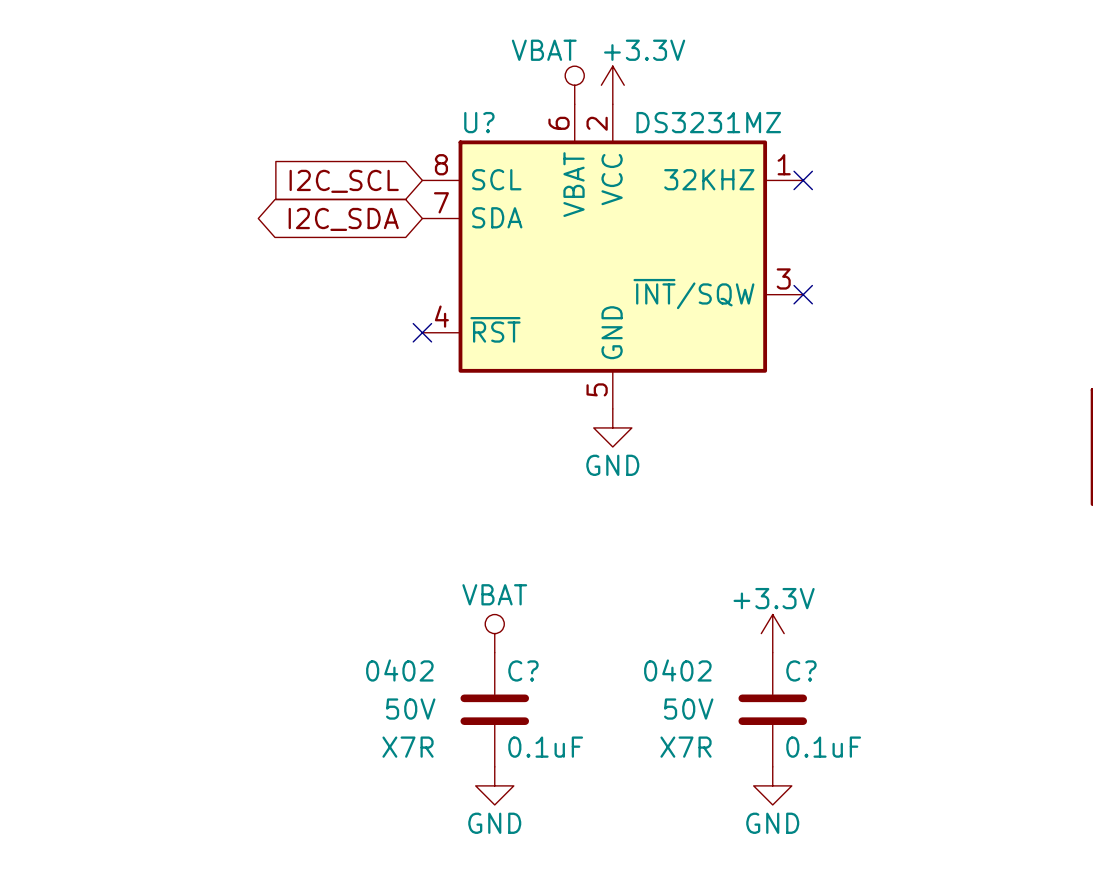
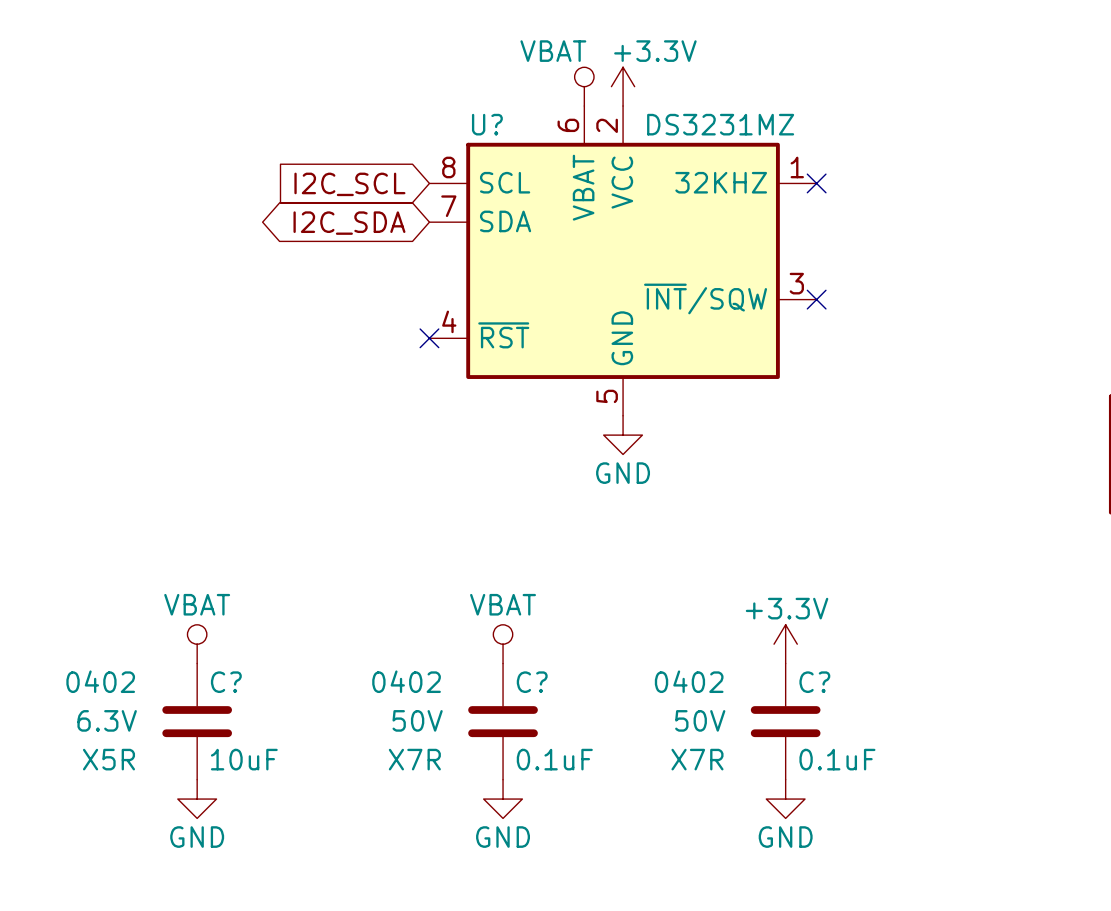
power symbol: none -> VBAT (197, 644)
C?: none -> 10uF (197, 721)
power symbol: none -> GND (197, 799)

